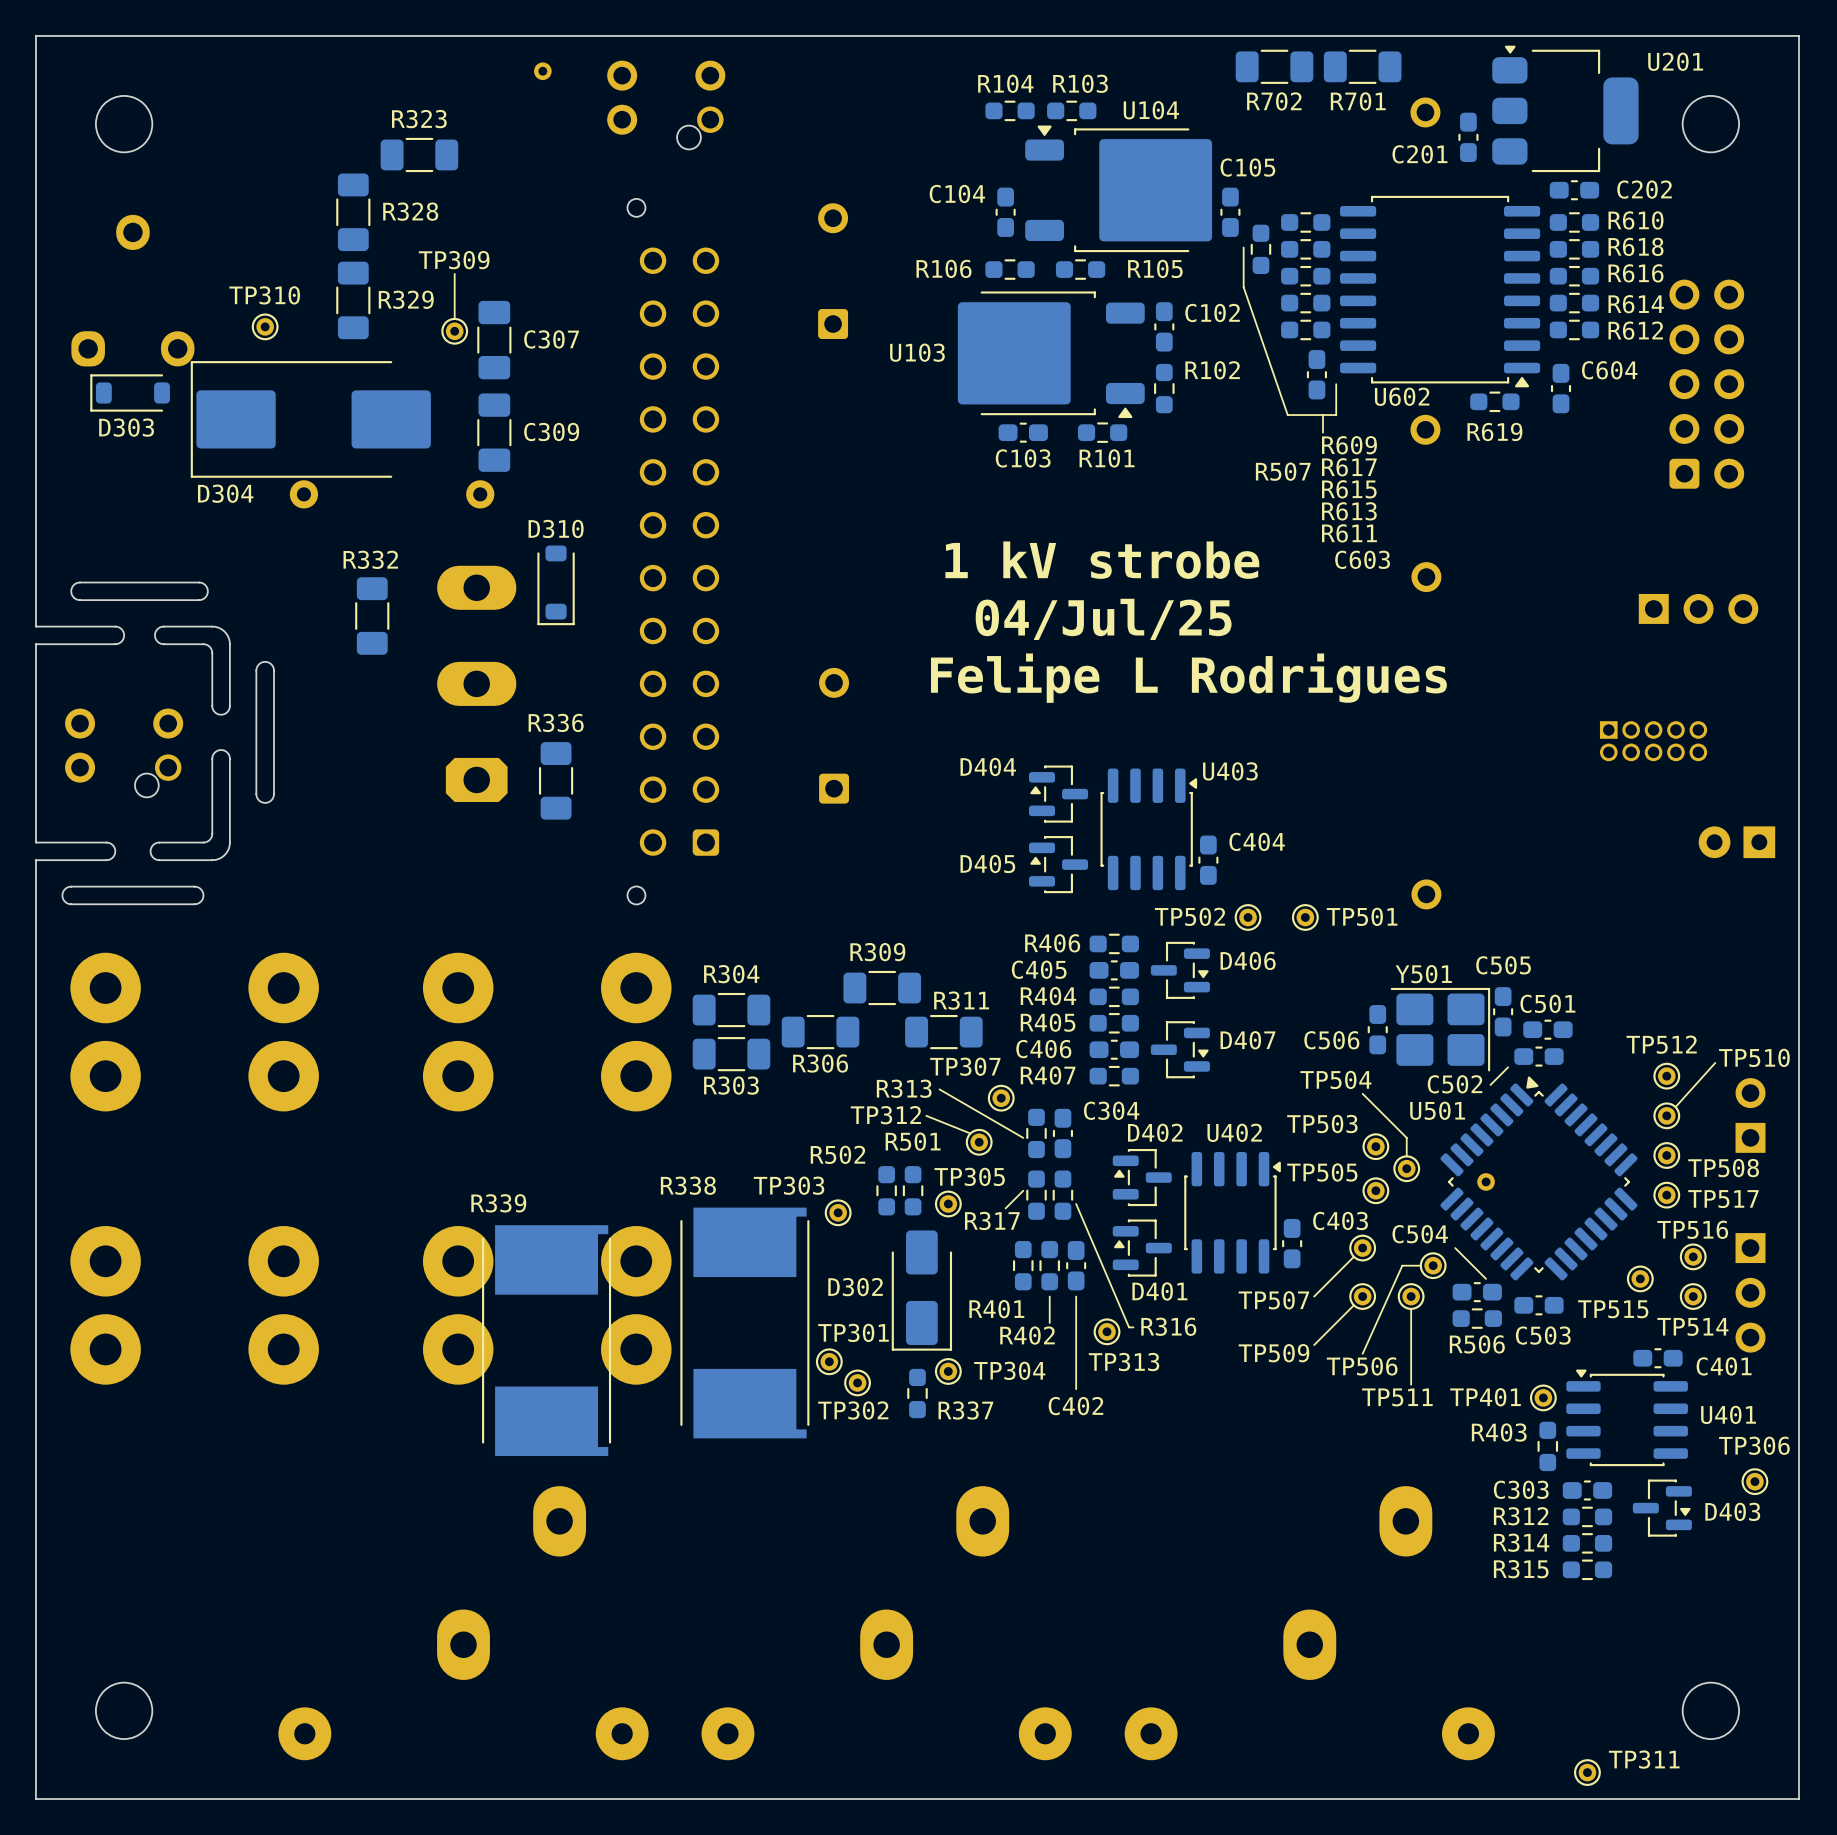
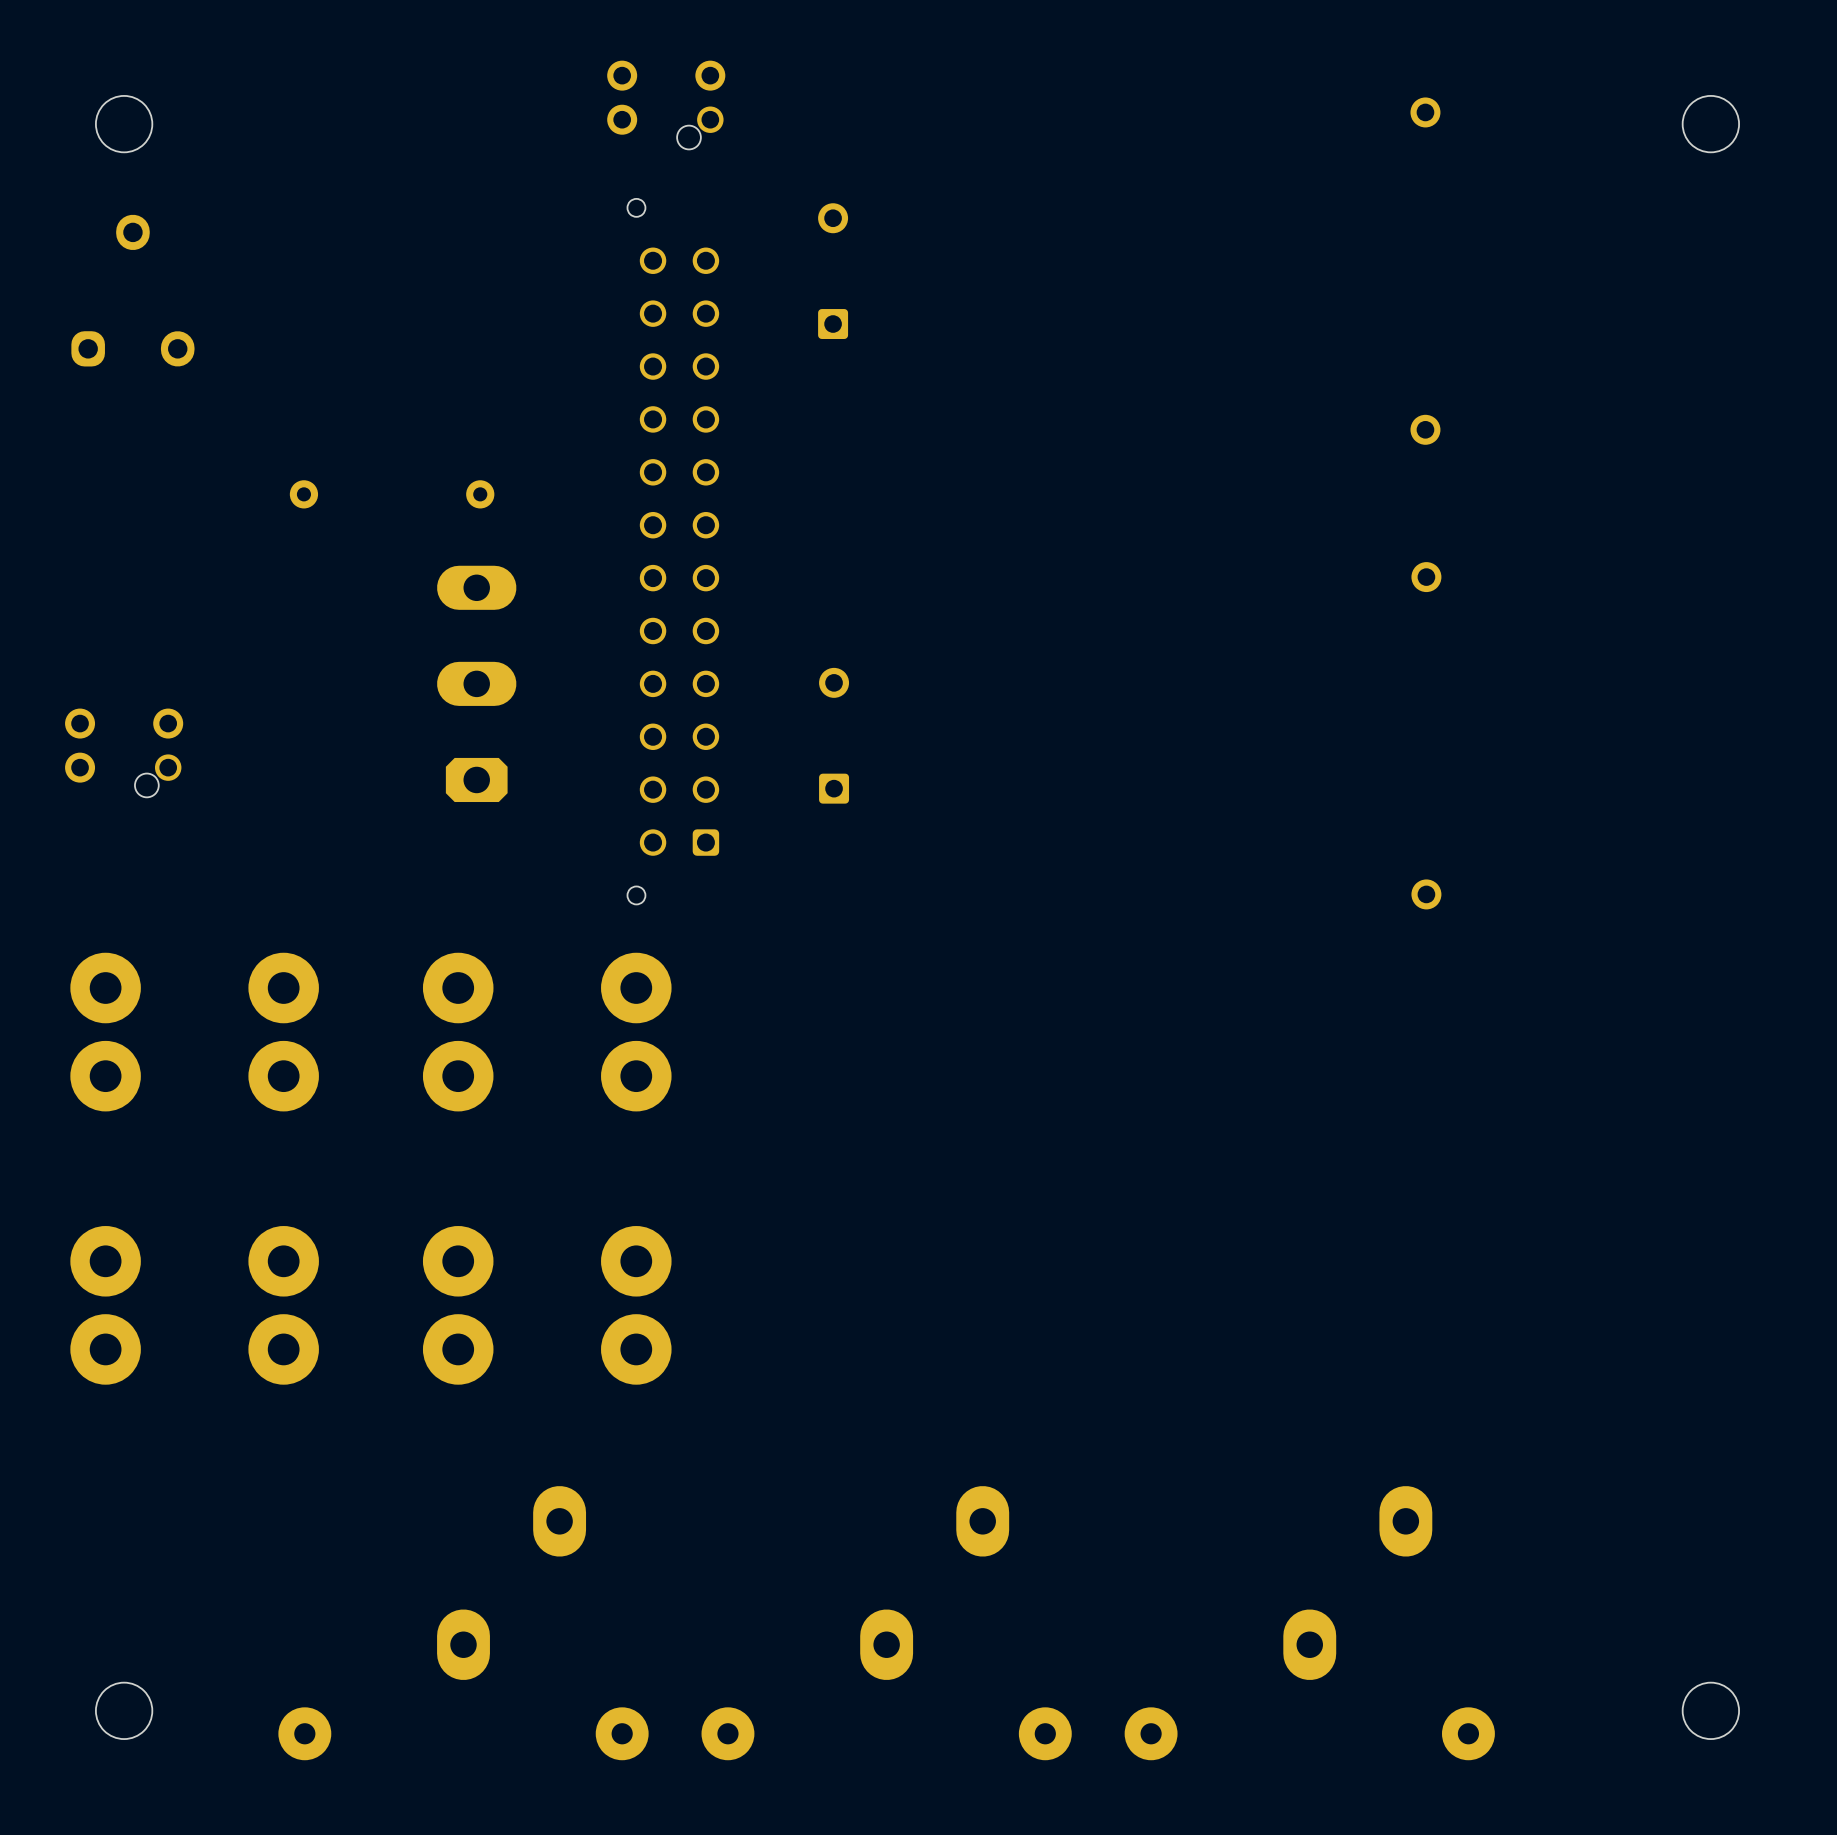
board edge: (1799, 35) (35, 35) (35, 626) (116, 626) (122, 630) (124, 635) (122, 640) (116, 644) (35, 644) (35, 842) (107, 842) (113, 846) (115, 851) (113, 856) (107, 860) (35, 860) (35, 1799) (1799, 1799) (1799, 35) -> none
R702: (1274, 66) -> none
R701: (1362, 66) -> none
part: (542, 71) -> none
U201: (1565, 108) -> none
R104: (1010, 110) -> none
R103: (1071, 110) -> none
C201: (1468, 137) -> none
R323: (419, 154) -> none
U104: (1118, 188) -> none
C202: (1574, 190) -> none
R328: (353, 212) -> none
C104: (1005, 212) -> none
C105: (1230, 212) -> none
R609: (1305, 222) -> none
R610: (1574, 222) -> none
line: (1243, 247) (1243, 287) (1287, 415) (1336, 415) (1336, 384) -> none
R507: (1260, 249) -> none
R617: (1305, 249) -> none
R618: (1574, 249) -> none
R106: (1010, 269) -> none
R105: (1080, 269) -> none
line: (454, 273) (454, 318) -> none
R615: (1305, 276) -> none
R616: (1574, 276) -> none
U602: (1440, 291) -> none
R329: (353, 300) -> none
R613: (1305, 303) -> none
R614: (1574, 303) -> none
TP310: (265, 326) -> none
C102: (1164, 326) -> none
R611: (1305, 329) -> none
R612: (1574, 329) -> none
TP309: (454, 331) -> none
C307: (494, 340) -> none
U103: (1051, 354) -> none
C603: (1316, 374) -> none
part: (1706, 384) -> none
R102: (1164, 388) -> none
C604: (1561, 388) -> none
D303: (130, 392) -> none
R619: (1494, 401) -> none
line: (1322, 415) (1322, 432) -> none
D304: (310, 419) -> none
C309: (494, 432) -> none
C103: (1023, 432) -> none
R101: (1102, 432) -> none
text: 1 kV strobe (1102, 560) -> none
board edge: (199, 582) (78, 582) (73, 585) (71, 592) (73, 597) (80, 600) (200, 600) (206, 596) (207, 590) (205, 585) (199, 582) -> none
D310: (556, 585) -> none
part: (1698, 608) -> none
R332: (372, 616) -> none
text: 04/Jul/25 (1103, 619) -> none
board edge: (212, 626) (162, 626) (156, 630) (155, 636) (161, 643) (204, 644) (210, 647) (212, 653) (212, 707) (215, 712) (222, 714) (227, 712) (229, 707) (229, 642) (224, 631) (212, 626) -> none
board edge: (273, 670) (273, 795) (270, 801) (264, 802) (258, 799) (256, 794) (256, 669) (258, 664) (265, 661) (271, 664) (273, 670) -> none
text: Felipe L Rodrigues (1188, 678) -> none
part: (1653, 741) -> none
board edge: (229, 758) (229, 842) (226, 853) (214, 860) (159, 860) (154, 858) (150, 850) (156, 843) (204, 842) (210, 839) (212, 833) (212, 756) (215, 751) (222, 750) (228, 753) (229, 758) -> none
R336: (556, 780) -> none
D404: (1058, 794) -> none
U403: (1148, 829) -> none
part: (1736, 842) -> none
C404: (1208, 860) -> none
D405: (1058, 864) -> none
board edge: (194, 886) (70, 886) (64, 890) (62, 896) (65, 902) (71, 904) (195, 904) (201, 900) (203, 894) (200, 888) (194, 886) -> none
TP502: (1248, 917) -> none
TP501: (1305, 917) -> none
R406: (1114, 943) -> none
C405: (1114, 970) -> none
D406: (1180, 970) -> none
R309: (882, 988) -> none
R404: (1114, 996) -> none
R304: (731, 1010) -> none
C505: (1503, 1011) -> none
R405: (1114, 1023) -> none
C506: (1377, 1029) -> none
Y501: (1440, 1029) -> none
C501: (1547, 1029) -> none
R306: (820, 1032) -> none
R311: (943, 1032) -> none
C406: (1114, 1049) -> none
D407: (1180, 1049) -> none
R303: (731, 1054) -> none
C502: (1538, 1056) -> none
line: (1715, 1062) (1675, 1107) -> none
line: (1508, 1067) (1490, 1084) -> none
R407: (1114, 1076) -> none
TP512: (1666, 1076) -> none
line: (939, 1089) (1023, 1137) -> none
line: (1362, 1093) (1406, 1137) (1406, 1156) -> none
TP307: (1001, 1098) -> none
line: (926, 1115) (970, 1133) -> none
TP510: (1666, 1115) -> none
part: (1750, 1115) -> none
R313: (1036, 1133) -> none
C304: (1062, 1133) -> none
TP312: (979, 1142) -> none
TP503: (1375, 1146) -> none
TP508: (1666, 1155) -> none
TP504: (1406, 1168) -> none
D402: (1142, 1177) -> none
U501: (1538, 1178) -> none
part: (1486, 1181) -> none
R502: (886, 1190) -> none
R501: (913, 1190) -> none
line: (1023, 1190) (1005, 1208) -> none
TP505: (1375, 1190) -> none
R317: (1036, 1195) -> none
R316: (1062, 1195) -> none
TP517: (1666, 1195) -> none
TP305: (948, 1203) -> none
line: (1076, 1203) (1129, 1327) (1133, 1327) -> none
TP303: (838, 1212) -> none
U402: (1232, 1212) -> none
C403: (1292, 1243) -> none
D401: (1142, 1248) -> none
TP507: (1362, 1248) -> none
line: (1455, 1248) (1486, 1278) -> none
line: (1353, 1256) (1314, 1296) -> none
TP516: (1693, 1256) -> none
R401: (1023, 1265) -> none
R402: (1049, 1265) -> none
C402: (1076, 1265) -> none
line: (1420, 1265) (1402, 1265) (1362, 1353) -> none
TP506: (1433, 1265) -> none
TP515: (1640, 1278) -> none
D302: (921, 1290) -> none
C504: (1477, 1292) -> none
part: (1750, 1292) -> none
line: (1049, 1296) (1049, 1322) -> none
line: (1076, 1296) (1076, 1389) -> none
TP509: (1362, 1296) -> none
TP511: (1411, 1296) -> none
TP514: (1693, 1296) -> none
line: (1353, 1305) (1314, 1345) -> none
C503: (1538, 1305) -> none
line: (1411, 1308) (1411, 1384) -> none
R506: (1477, 1318) -> none
R338: (744, 1322) -> none
TP313: (1107, 1331) -> none
R339: (546, 1340) -> none
C401: (1657, 1358) -> none
TP301: (829, 1361) -> none
TP304: (948, 1371) -> none
TP302: (857, 1382) -> none
R337: (917, 1393) -> none
TP401: (1543, 1397) -> none
U401: (1627, 1417) -> none
R403: (1547, 1446) -> none
TP306: (1754, 1481) -> none
C303: (1587, 1490) -> none
D403: (1662, 1508) -> none
R312: (1587, 1516) -> none
R314: (1587, 1543) -> none
R315: (1587, 1569) -> none
TP311: (1587, 1772) -> none

